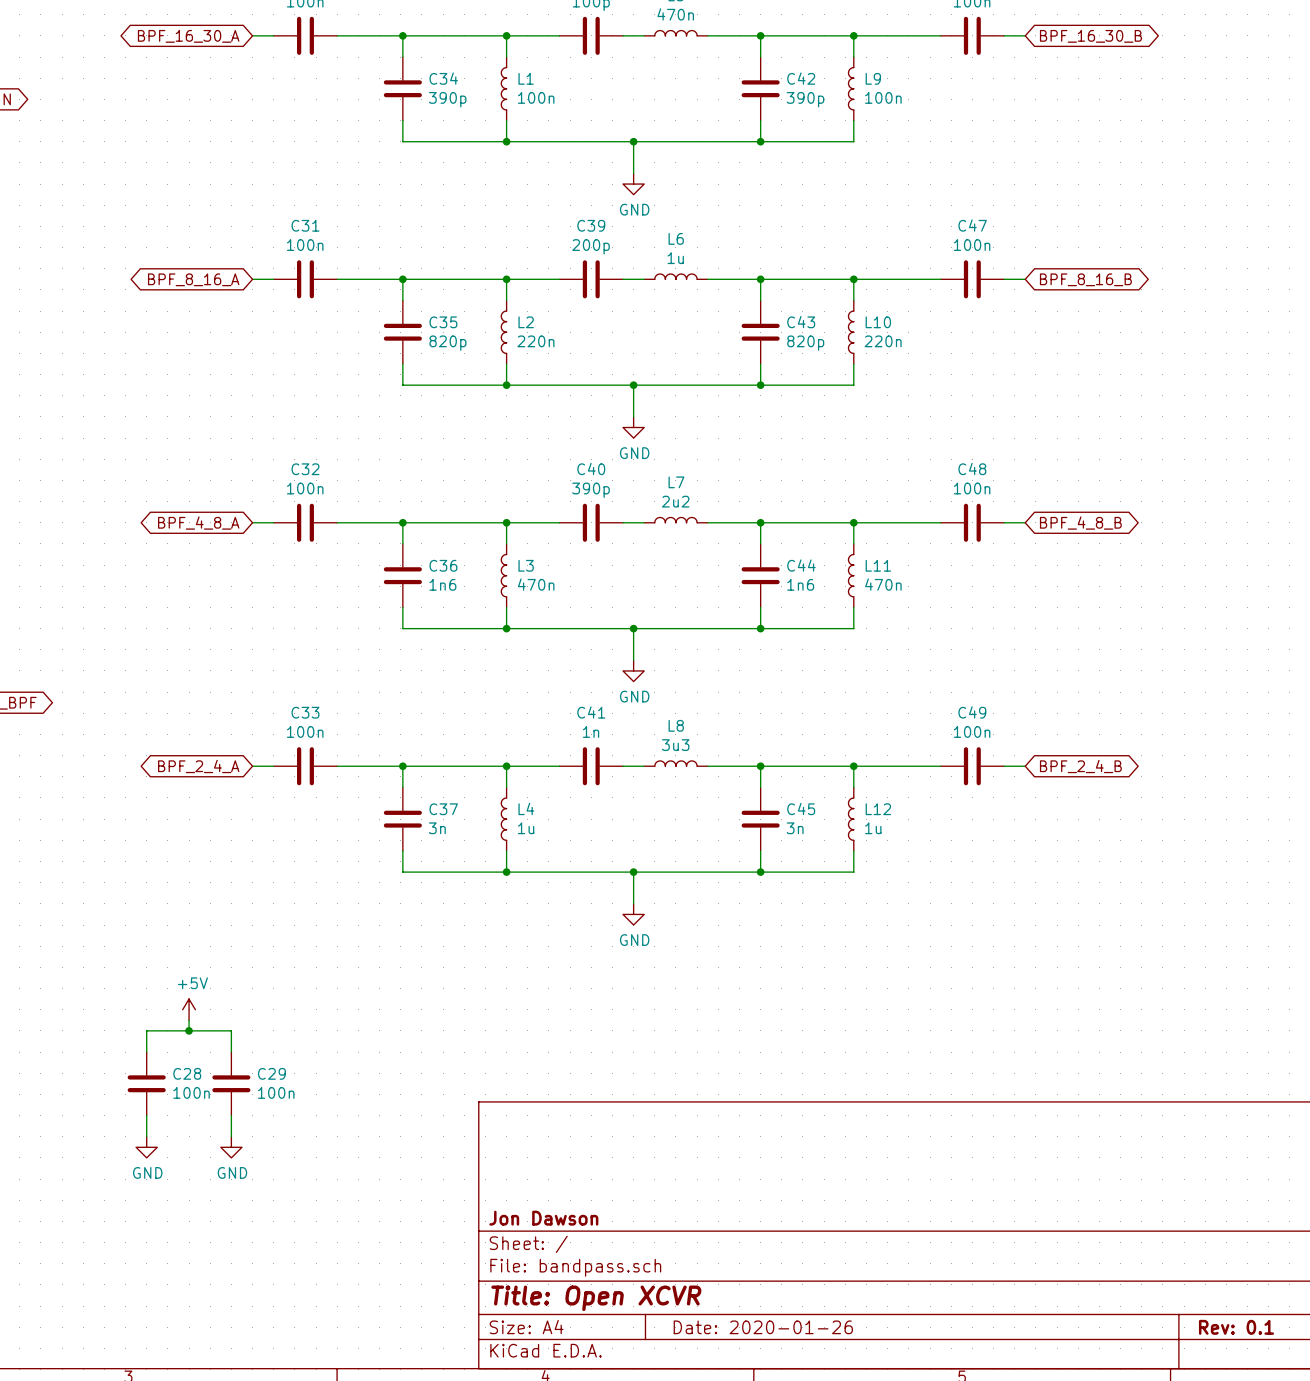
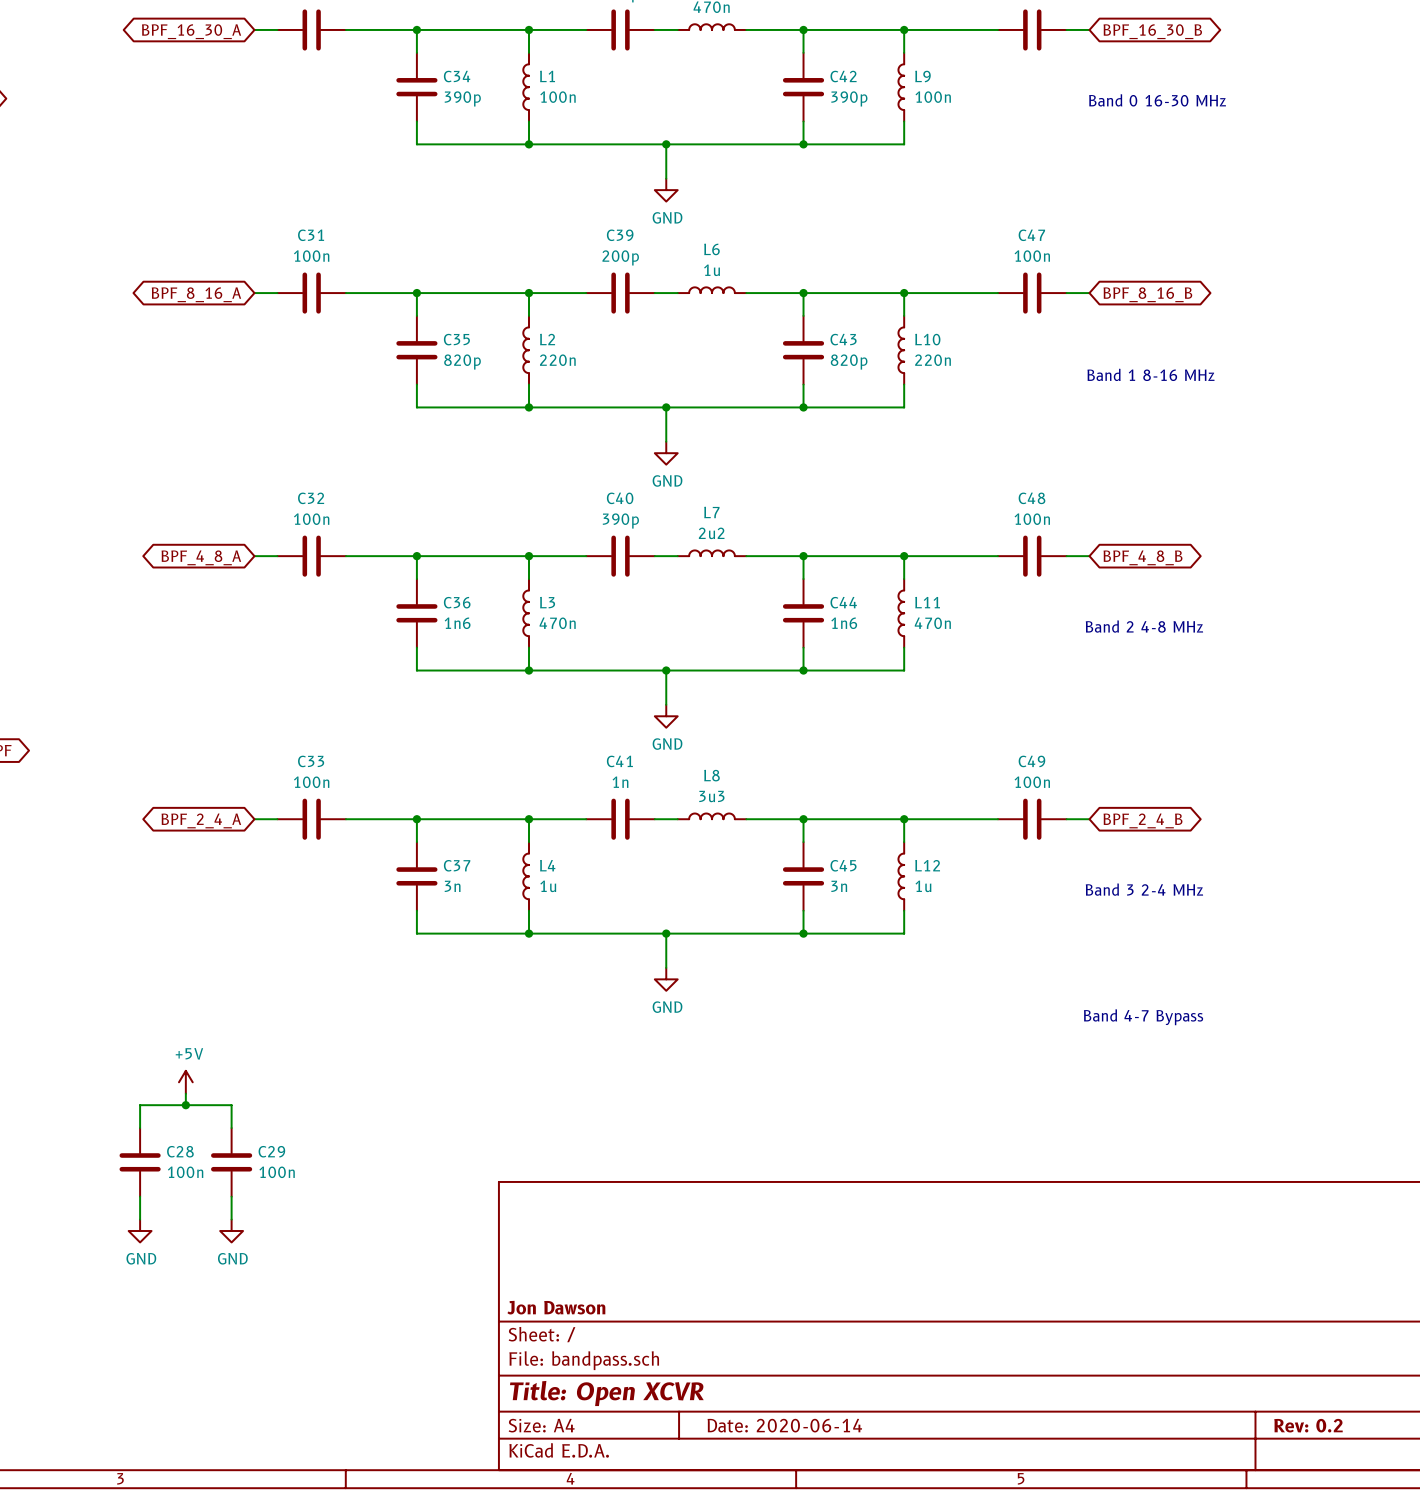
text: none -> Band 0 16-30 MHz (1157, 100)
text: none -> Band 1 8-16 MHz (1150, 374)
text: none -> Band 2 4-8 MHz (1144, 626)
text: none -> Band 3 2-4 MHz (1144, 889)
text: none -> Band 4-7 Bypass (1143, 1017)
title block: Date: 2020-01-26 (763, 1327) -> Date: 2020-06-14 (784, 1425)
title block: Rev: 0.1 (1236, 1327) -> Rev: 0.2 (1308, 1425)

